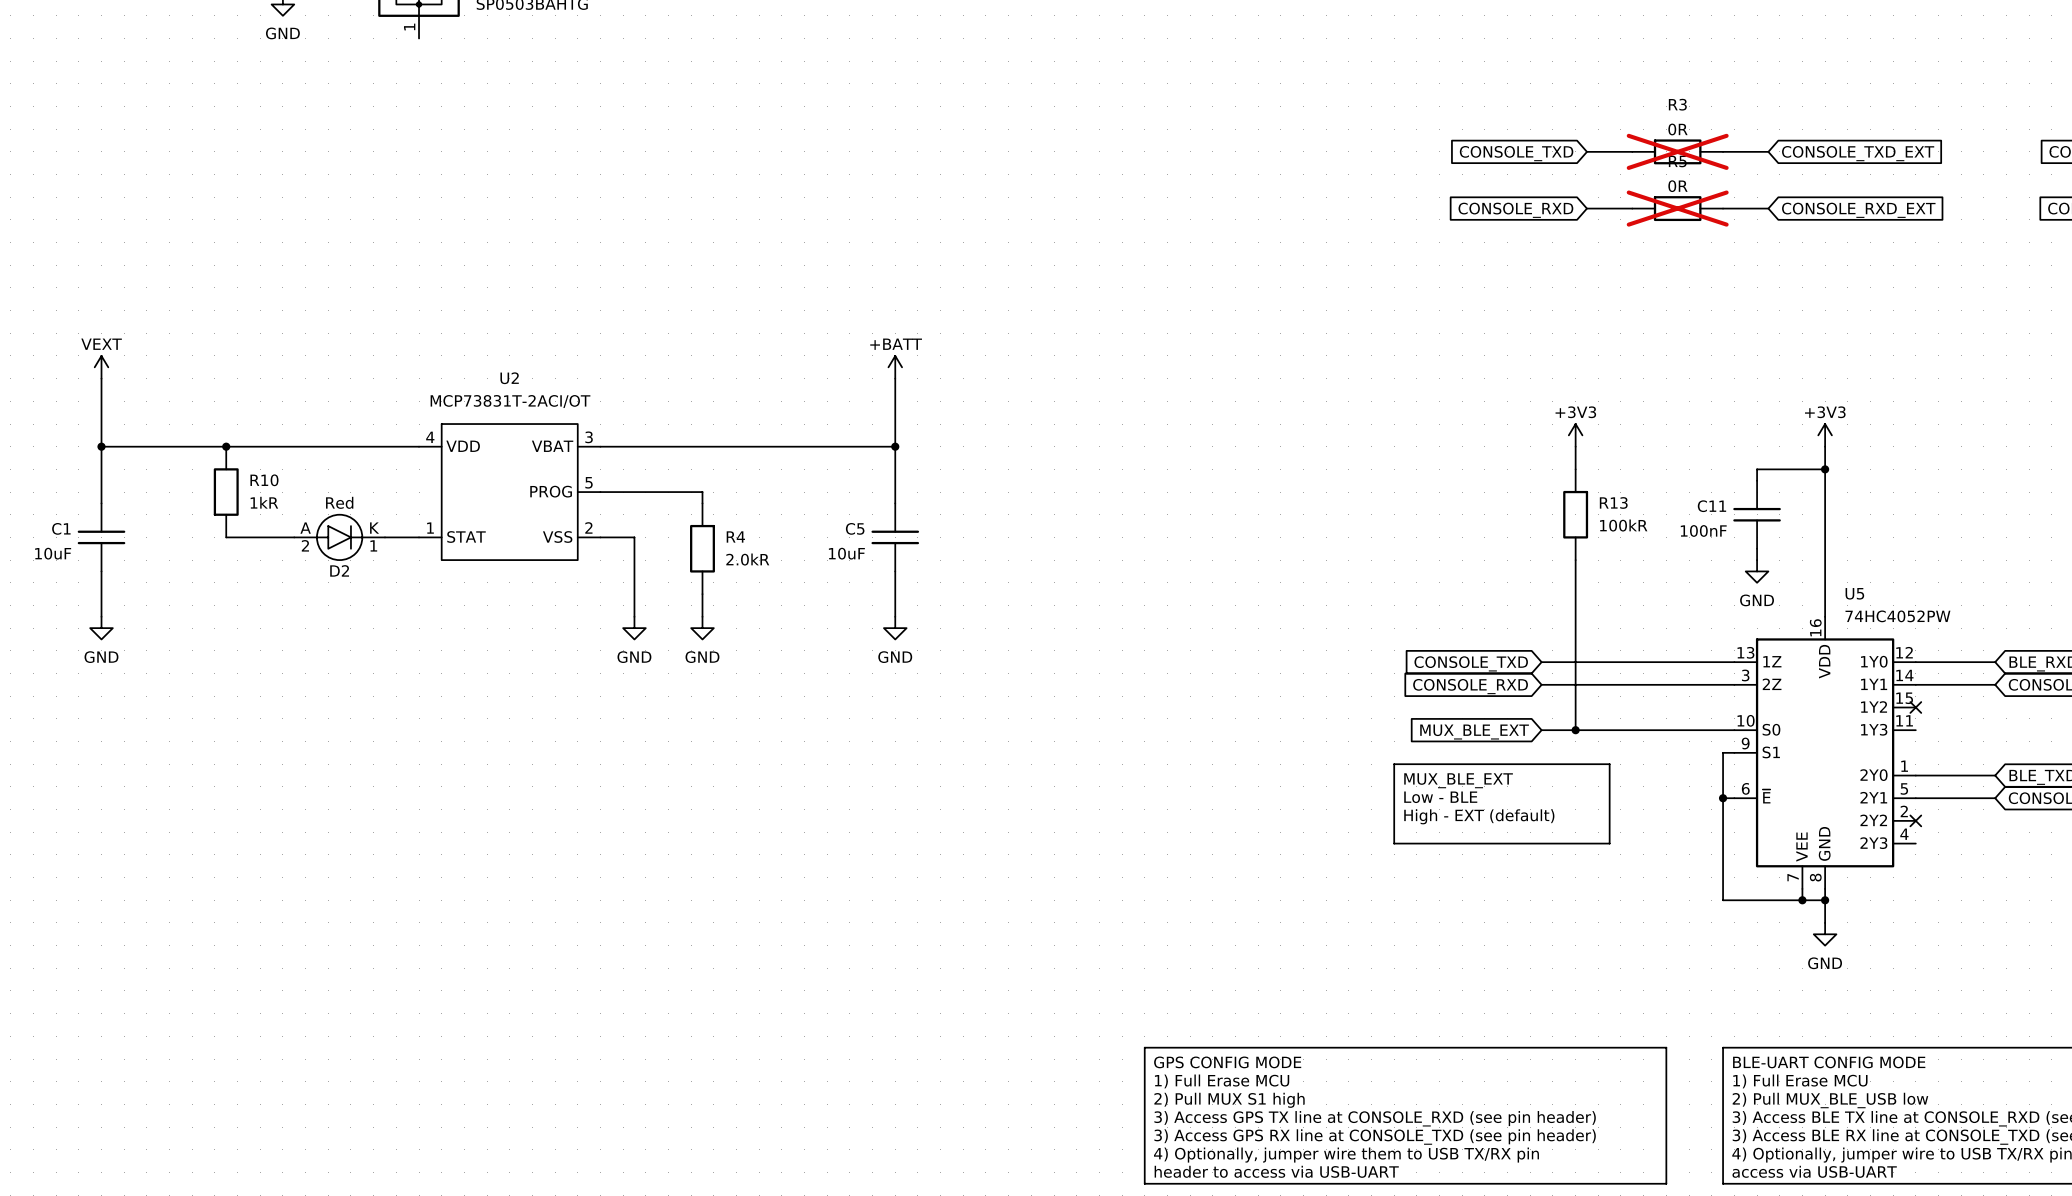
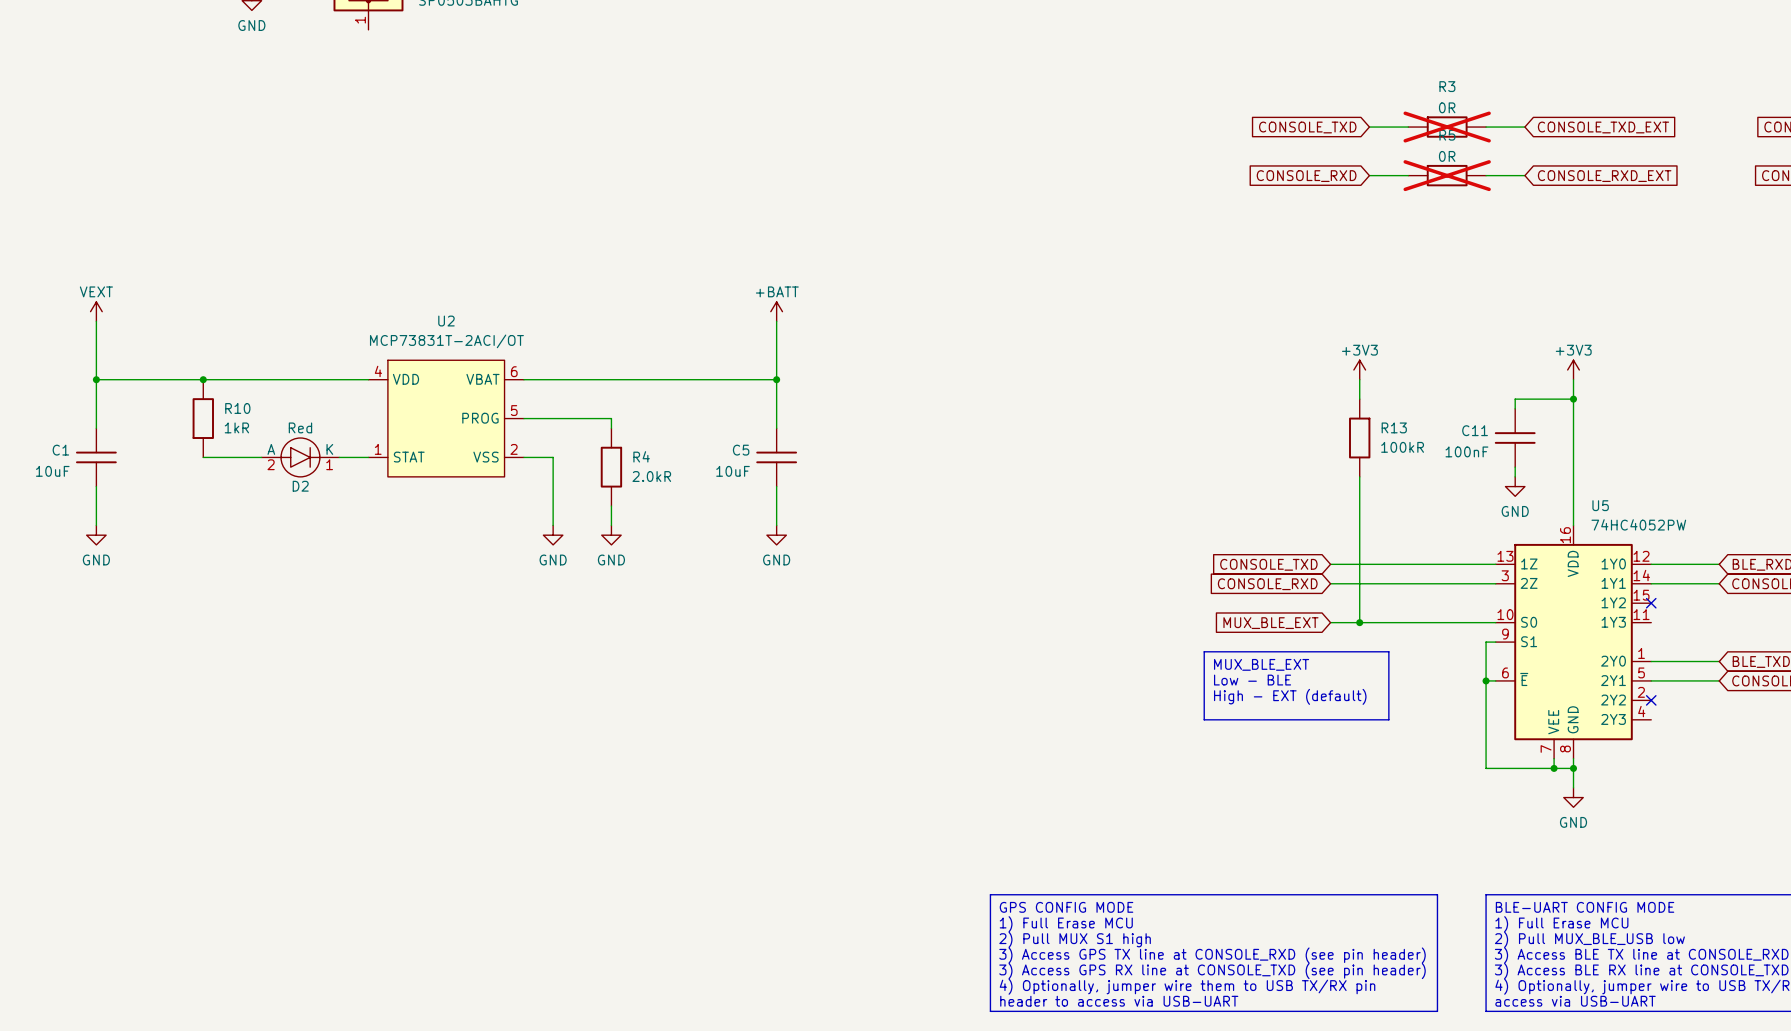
U2 pin number: 3 (589, 437) -> 6 (514, 371)

